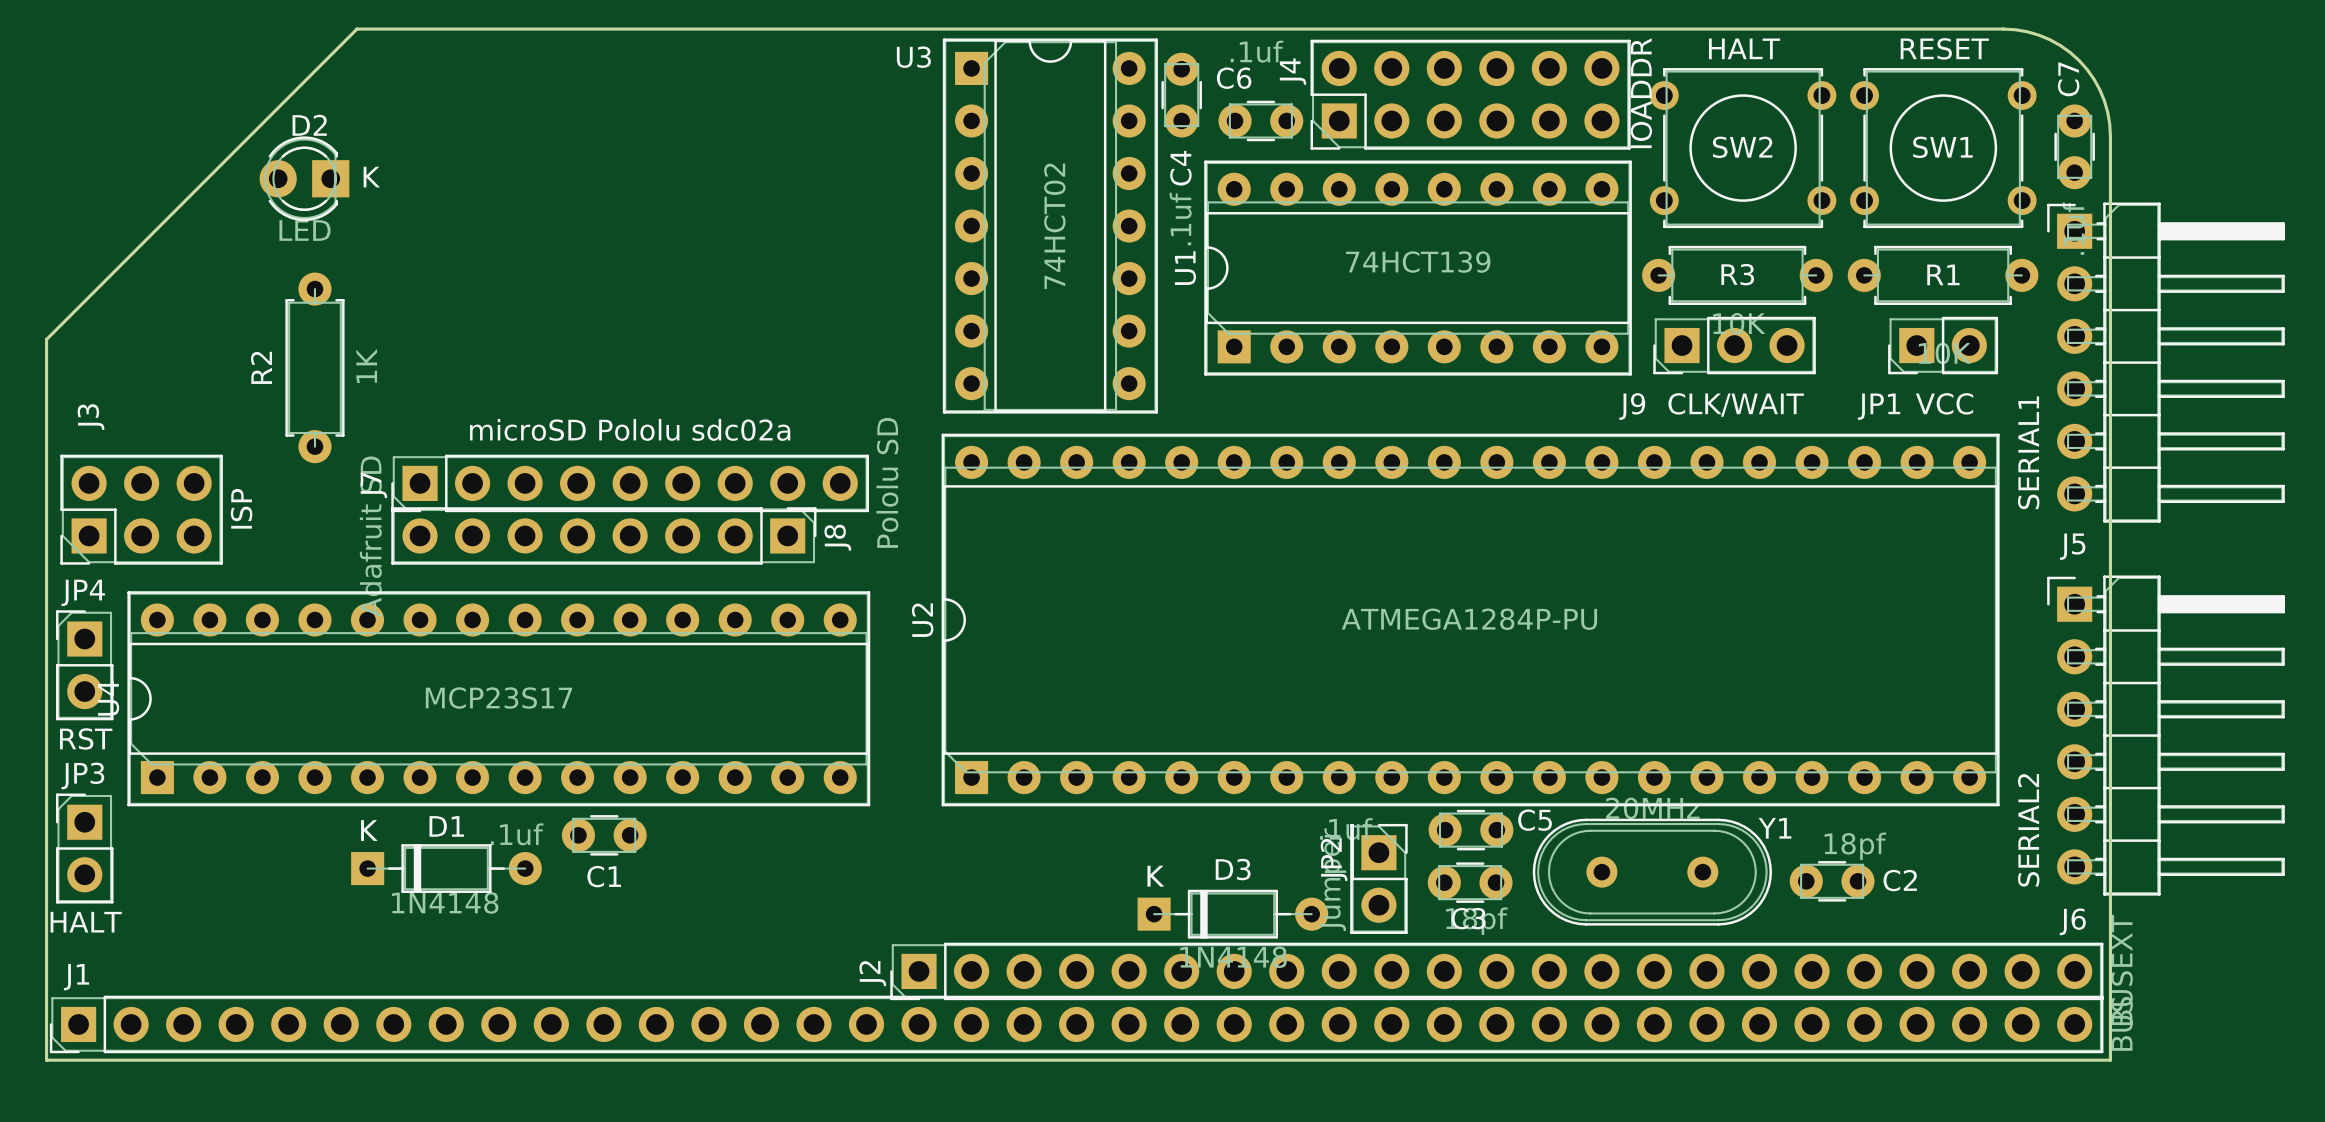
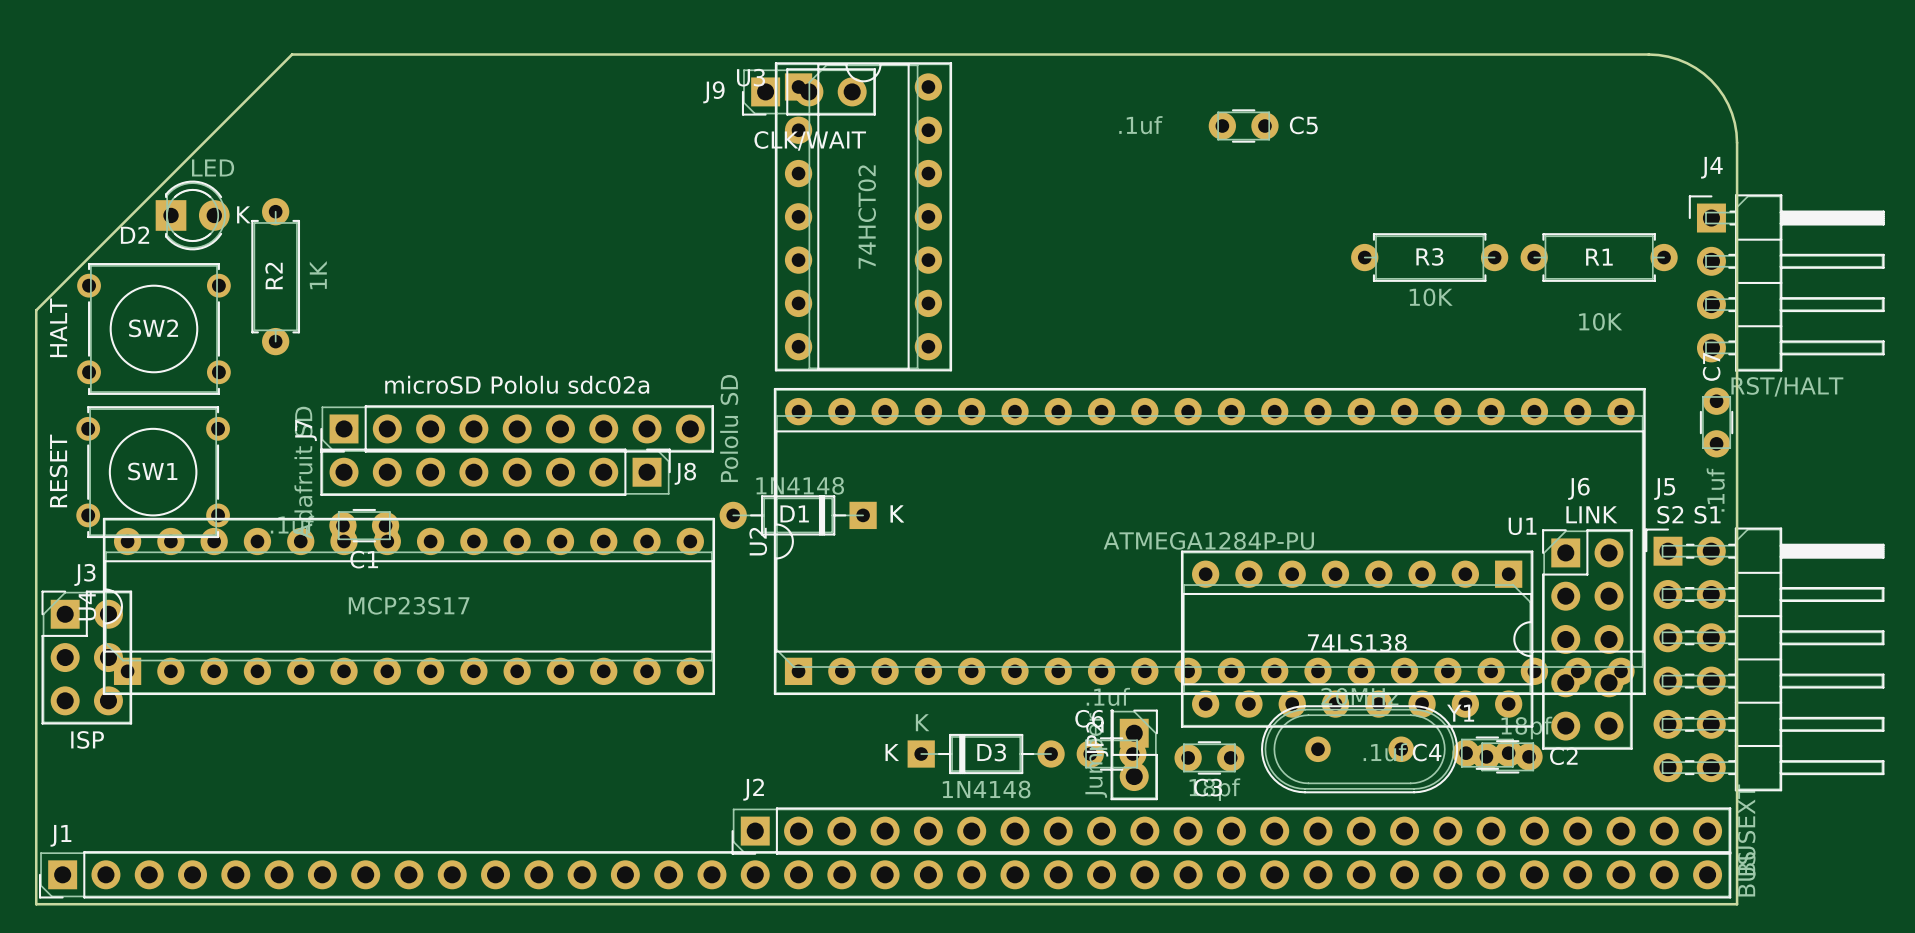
J4 footprint: [1310, 39, 1631, 150] -> [1688, 194, 1885, 372]
SW2 value rotation: 0° (1744, 48) -> 90° counterclockwise (58, 327)
SW2 value position: HALT (1744, 48) -> HALT (58, 327)
SW1 value rotation: 0° (1944, 48) -> 90° counterclockwise (58, 470)
SW1 value position: RESET (1944, 48) -> RESET (58, 470)
J4 name position: J4 (1293, 71) -> J4 (1711, 167)
J4 value: IOADDR (1641, 93) -> RST/HALT (1787, 386)
C4 rotation: 0° (1181, 95) -> 90° clockwise (1487, 753)
C4 position: (1181, 95) -> (1487, 753)
C6 position: (1260, 120) -> (1111, 754)
D2 name position: D2 (309, 125) -> D2 (135, 235)
C7 position: (2074, 146) -> (1716, 422)
SW2 position: (1743, 148) -> (153, 328)
SW1 position: (1943, 148) -> (153, 472)
text position: K (371, 177) -> K (243, 214)
D2 rotation: 0° (304, 178) -> 180° (192, 215)
D2 position: (304, 178) -> (192, 215)
J5 footprint: [2047, 202, 2285, 523] -> [1645, 527, 1885, 792]
U1 value: 74HCT139 (1418, 262) -> 74LS138 (1357, 642)
U1 name position: U1 (1185, 268) -> U1 (1522, 526)
U1 rotation: 0° (1418, 268) -> 180° (1357, 639)
U1 position: (1418, 268) -> (1357, 639)
J9 position: (1734, 345) -> (808, 91)
JP1: VCC (1943, 345) -> none
R2 name position: R2 (261, 367) -> R2 (274, 276)
R2 position: (314, 367) -> (275, 276)
J9 name position: J9 (1632, 406) -> J9 (713, 92)
J3 name position: J3 (90, 417) -> J3 (84, 574)
J5 value: SERIAL1 (2028, 452) -> S2 S1 (1689, 514)
J3 rotation: 0° (141, 509) -> 90° clockwise (86, 657)
J3 position: (141, 509) -> (86, 657)
J8 name rotation: 0° (837, 537) -> 90° clockwise (685, 473)
J5 name position: J5 (2072, 546) -> J5 (1664, 489)
J6 footprint: [2047, 575, 2285, 896] -> [1542, 529, 1633, 750]
JP4: RST (84, 665) -> none
C5 name position: C5 (1535, 820) -> C5 (1303, 125)
C5 position: (1471, 830) -> (1243, 126)
J6 value: SERIAL2 (2028, 830) -> LINK (1591, 514)
C1 position: (604, 835) -> (364, 525)
D1 footprint: [351, 844, 542, 893] -> [719, 495, 877, 536]
JP3: HALT (84, 848) -> none
D3 name position: D3 (1233, 869) -> D3 (991, 752)
D3 footprint: [1137, 889, 1329, 939] -> [907, 733, 1065, 775]
D1 value position: 1N4148 (445, 902) -> 1N4148 (800, 485)
J6 name position: J6 (2072, 921) -> J6 (1578, 488)
J2 name rotation: 0° (872, 973) -> 90° clockwise (753, 789)
J2 name position: J2 (872, 973) -> J2 (753, 789)

